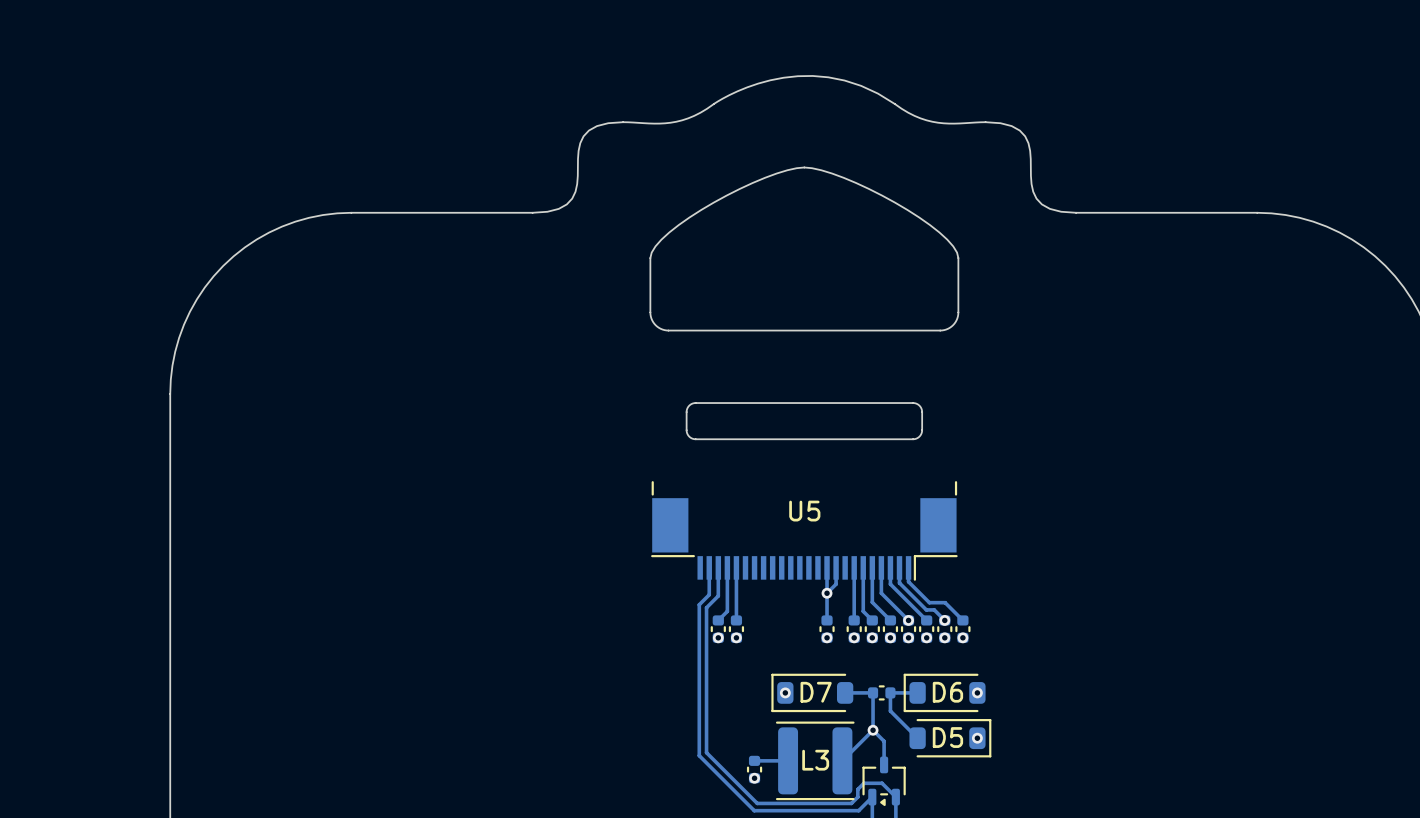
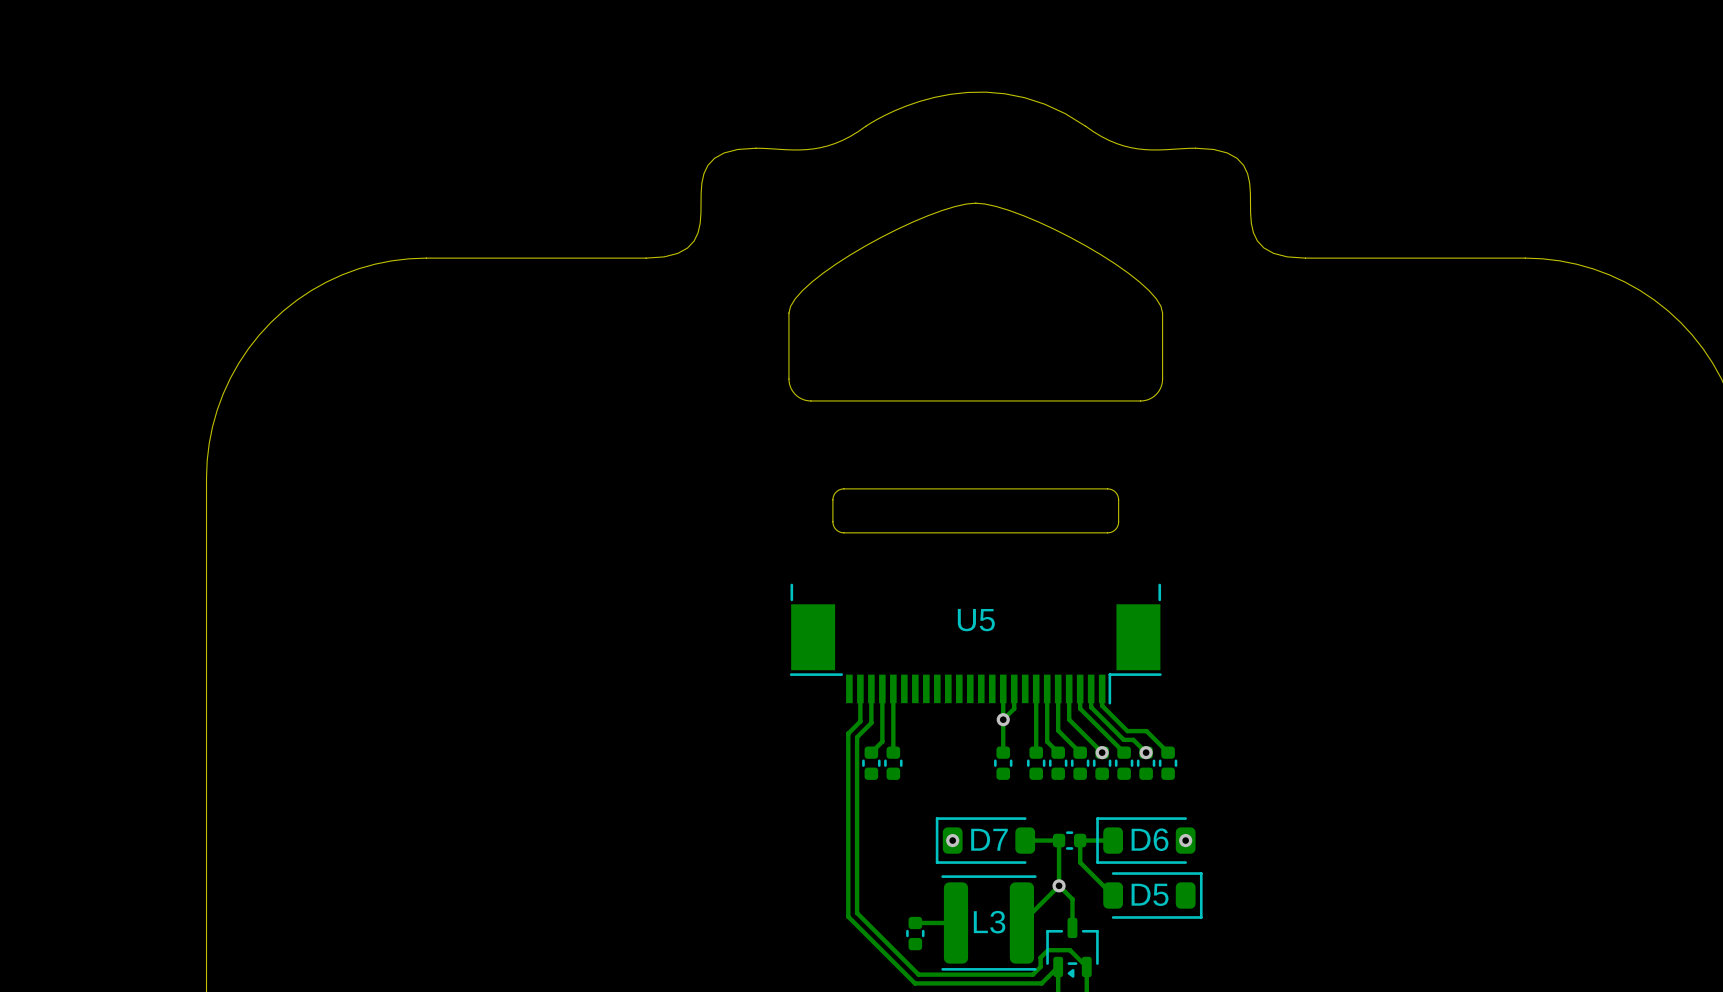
via: (718, 637) -> none
via: (736, 637) -> none
via: (827, 637) -> none
via: (854, 637) -> none
via: (872, 637) -> none
via: (890, 637) -> none
via: (908, 637) -> none
via: (926, 637) -> none
via: (944, 637) -> none
via: (962, 637) -> none
via: (977, 738) -> none
via: (754, 778) -> none

